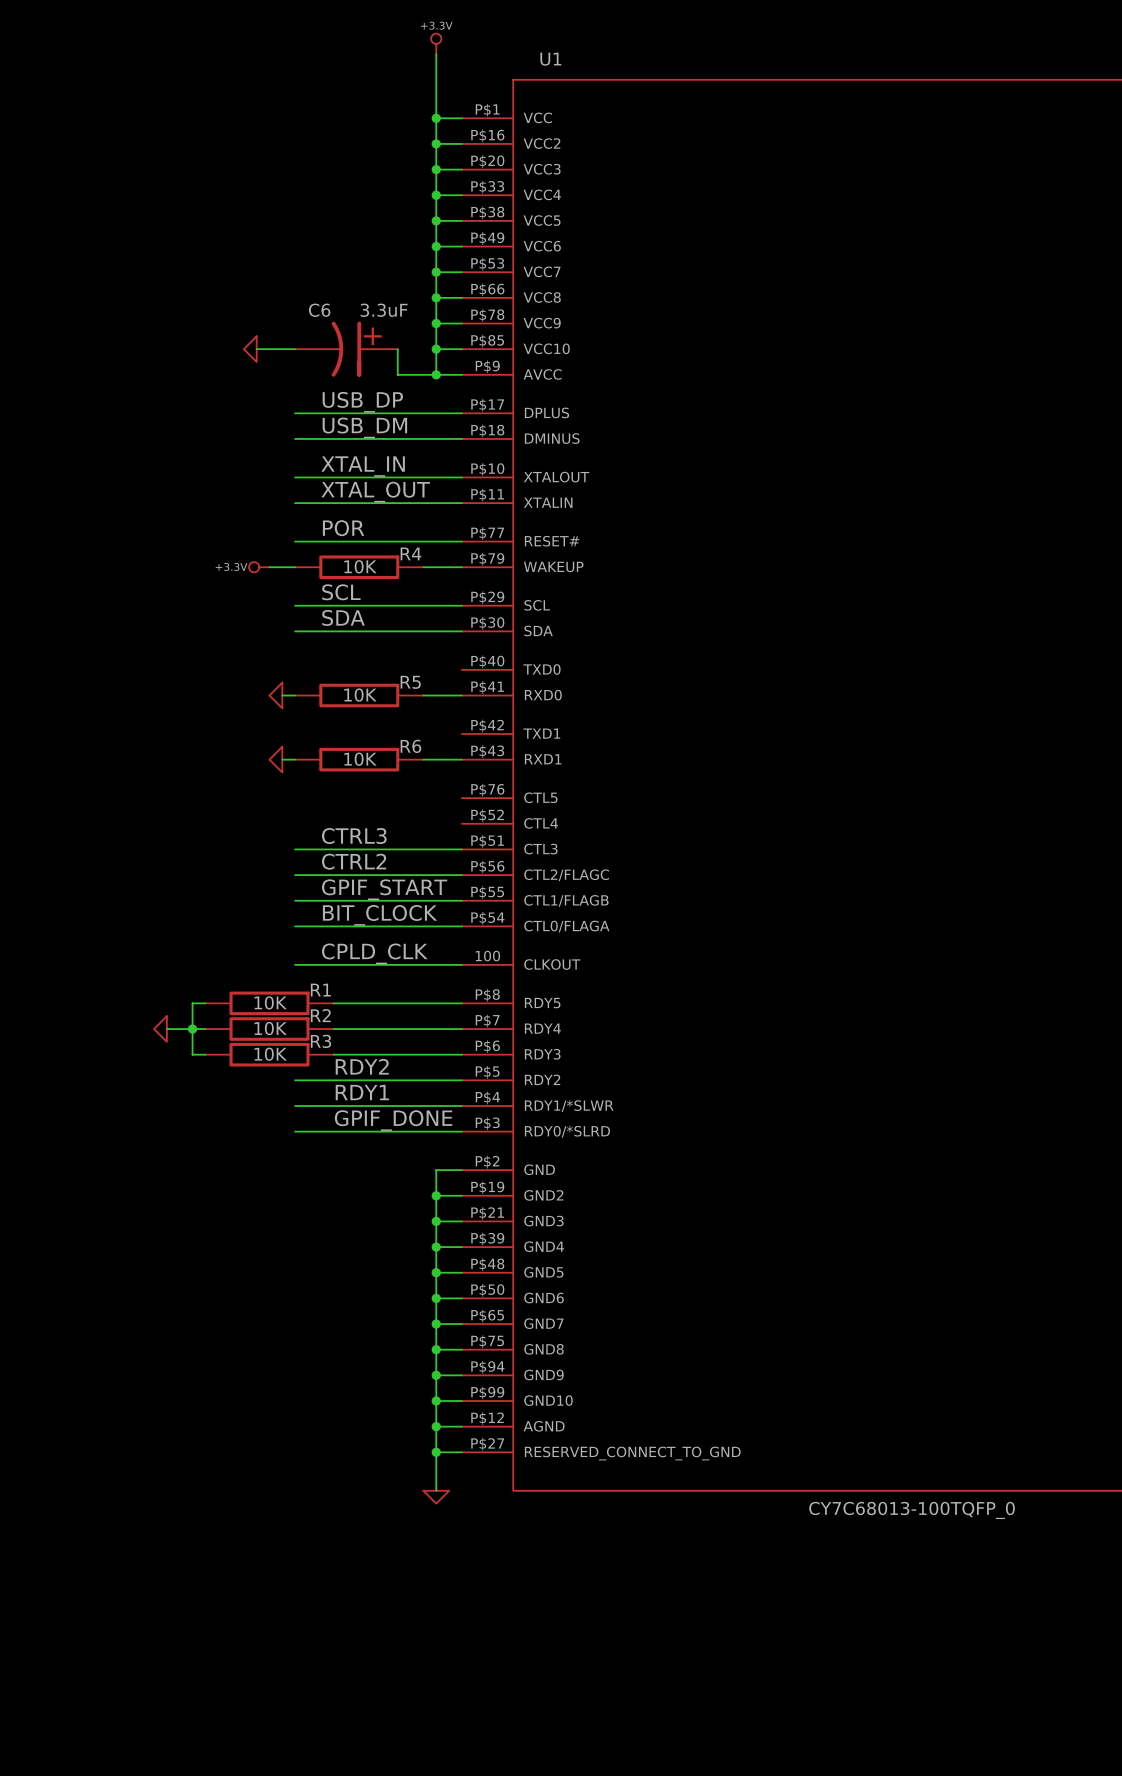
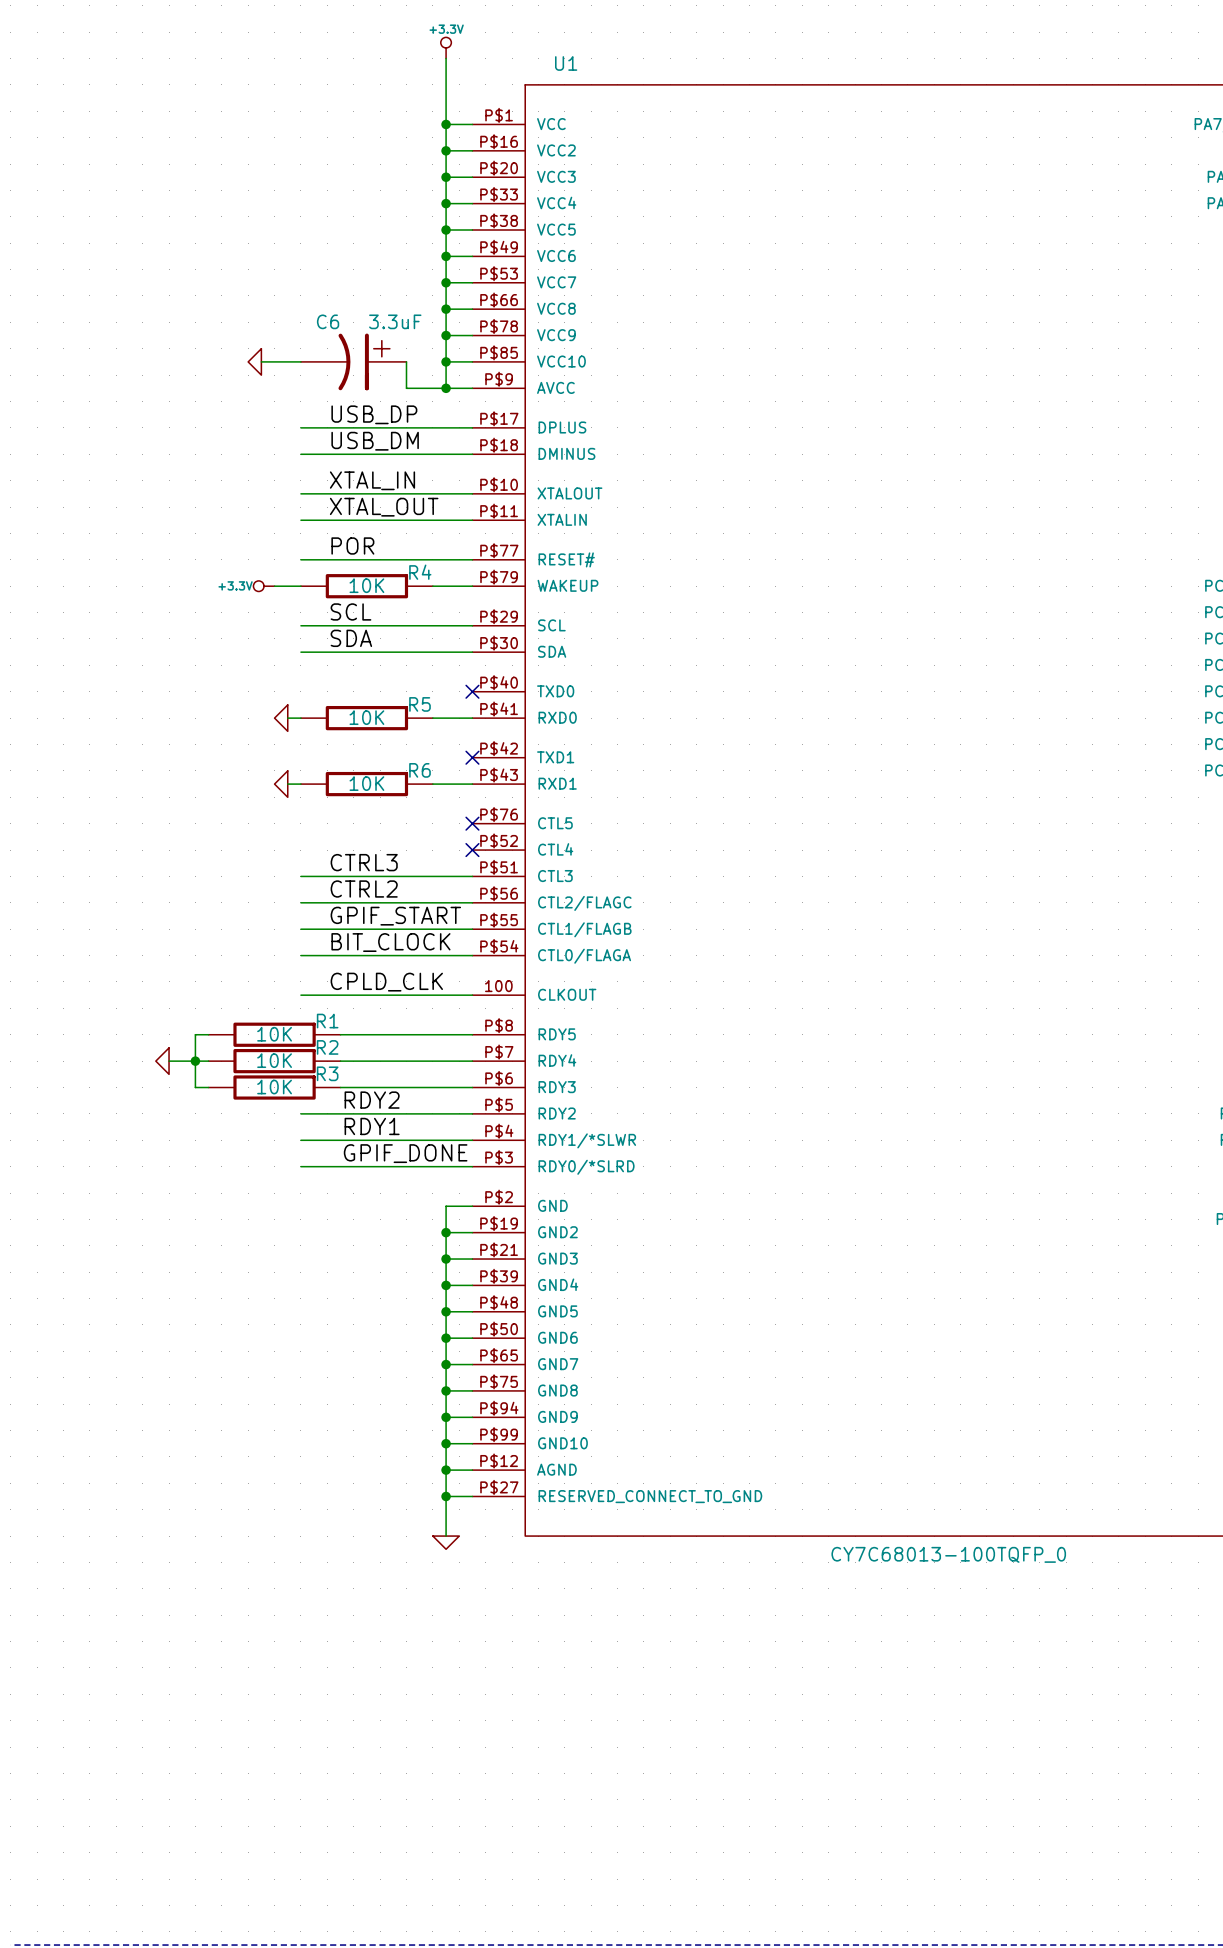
no-connect mark: none -> (472, 691)
no-connect mark: none -> (472, 757)
no-connect mark: none -> (472, 823)
no-connect mark: none -> (472, 850)

